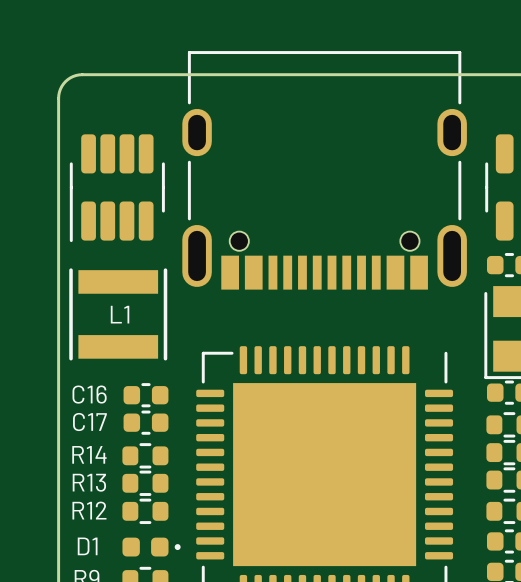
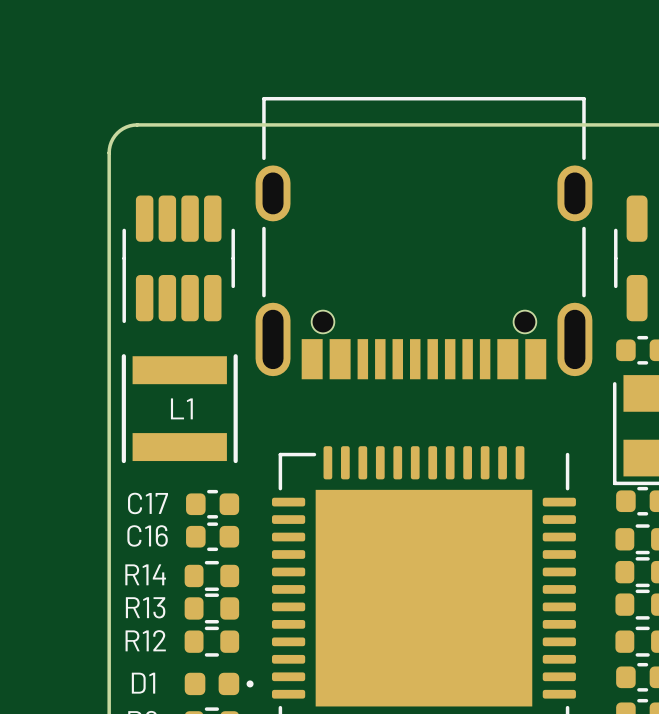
C16 name: C16 (89, 394) -> C17 (148, 503)
C17 name: C17 (89, 422) -> C16 (147, 535)

